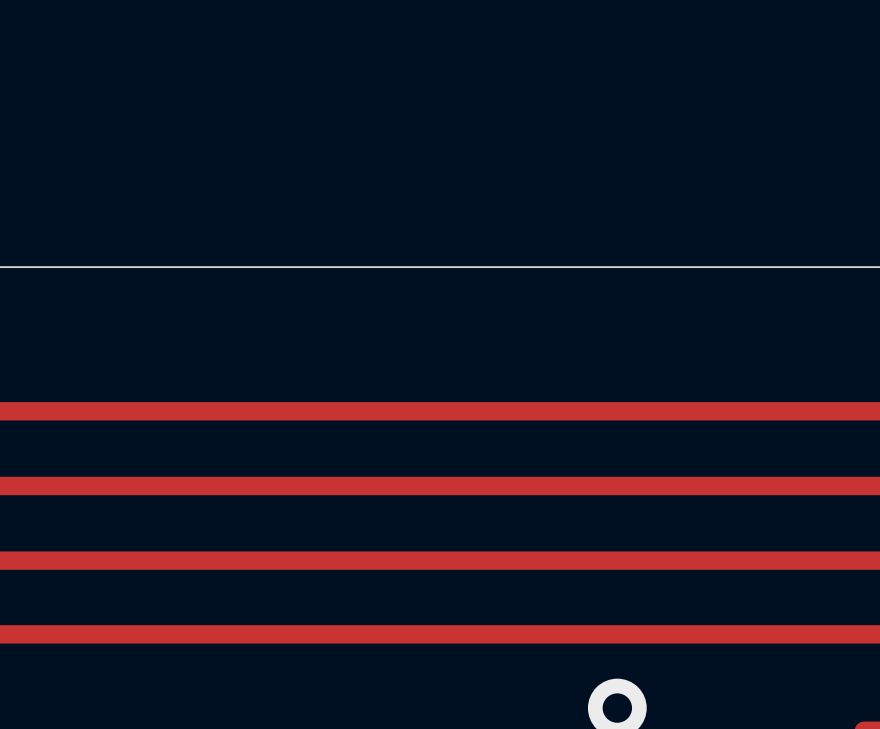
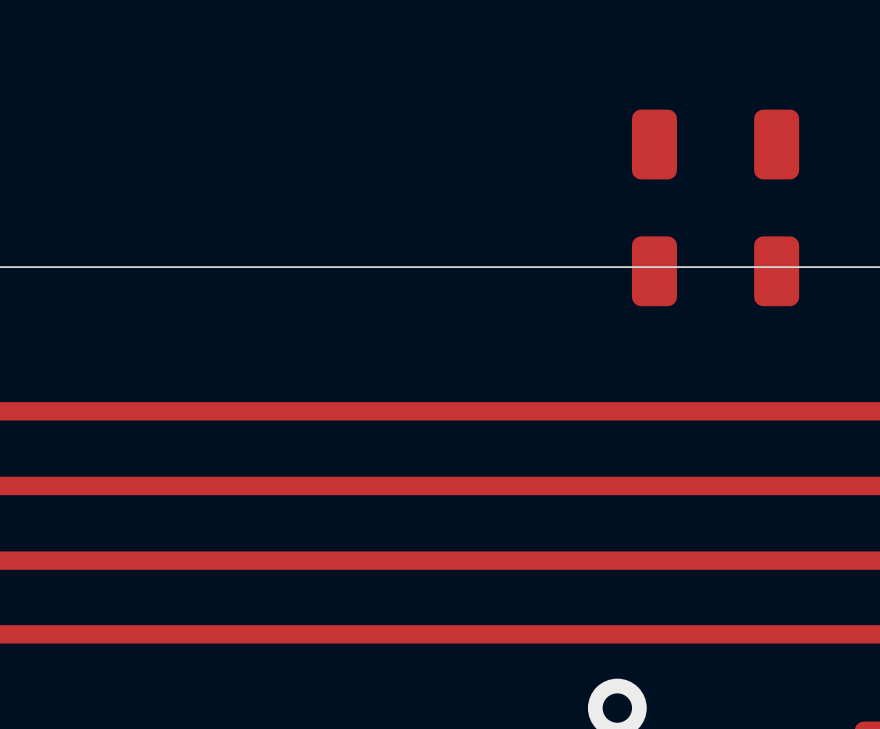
part: none -> (715, 144)
part: none -> (715, 271)

